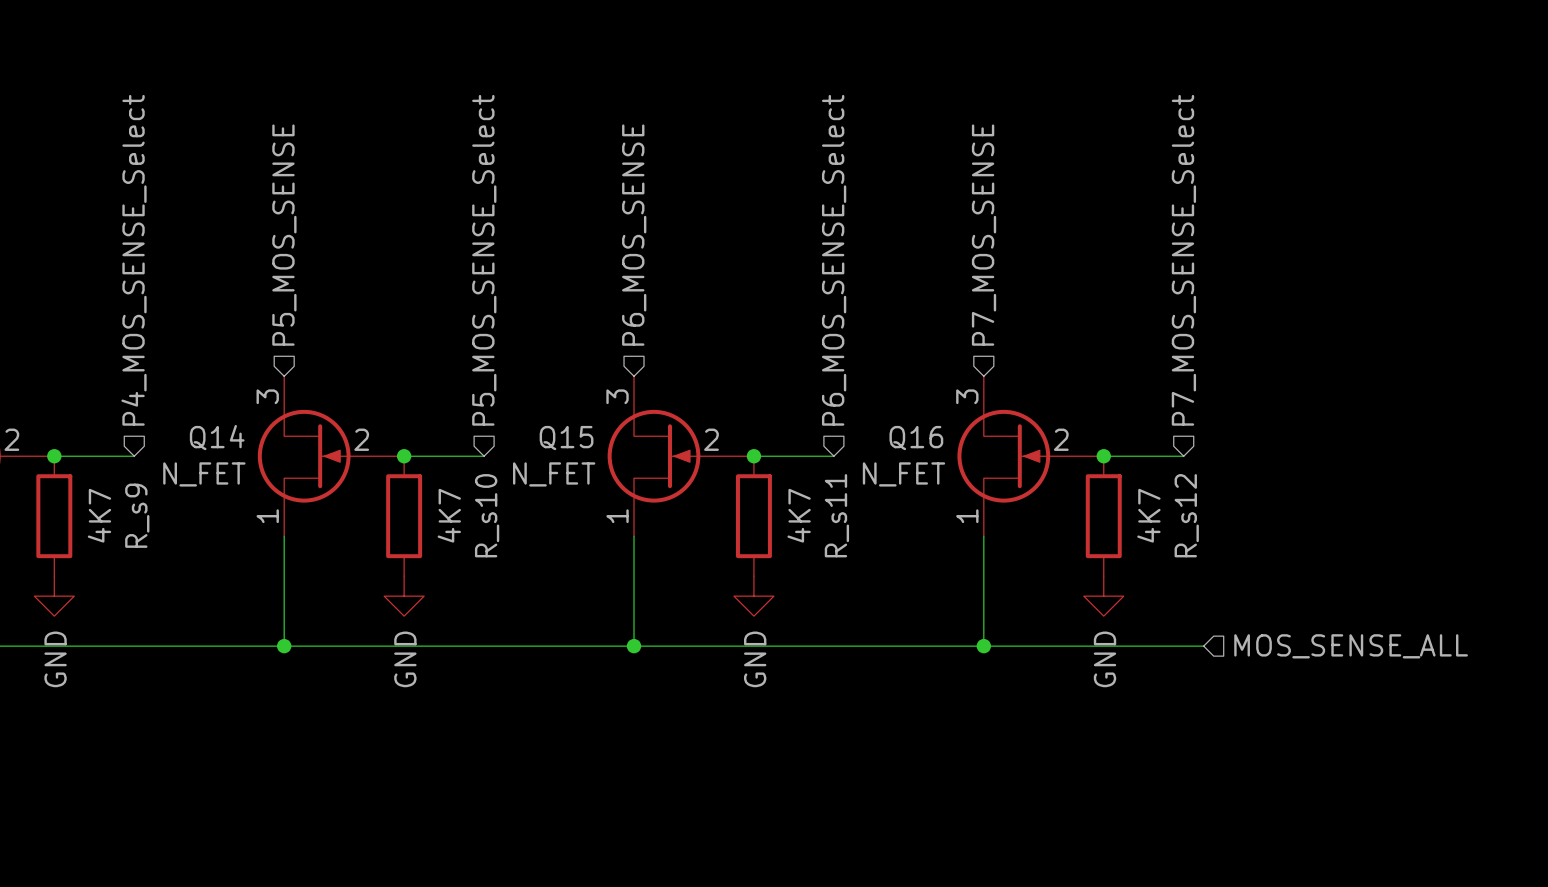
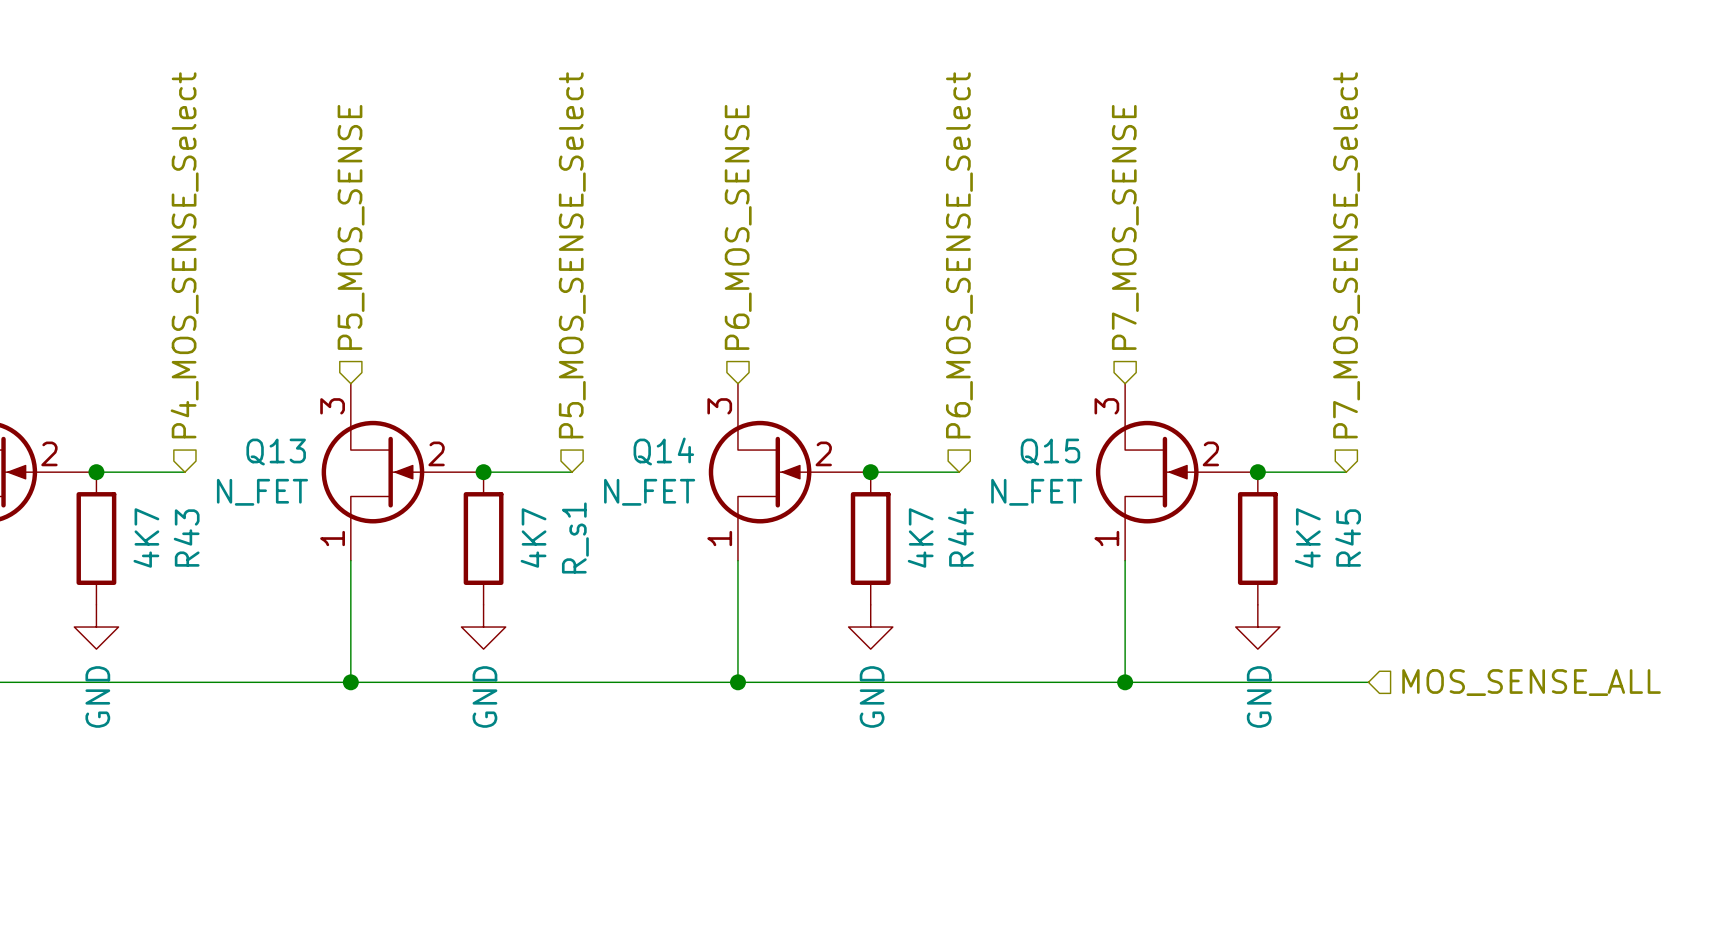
Q14 name: Q14 (217, 437) -> Q13 (276, 452)
Q15 name: Q15 (566, 438) -> Q14 (663, 451)
Q16 name: Q16 (916, 438) -> Q15 (1050, 452)
R_s9 name: R_s9 (137, 515) -> R43 (186, 538)
R_s10 name: R_s10 (487, 515) -> R_s1 (575, 538)
R_s11 name: R_s11 (836, 515) -> R44 (960, 537)
R_s12 name: R_s12 (1186, 515) -> R45 (1348, 538)

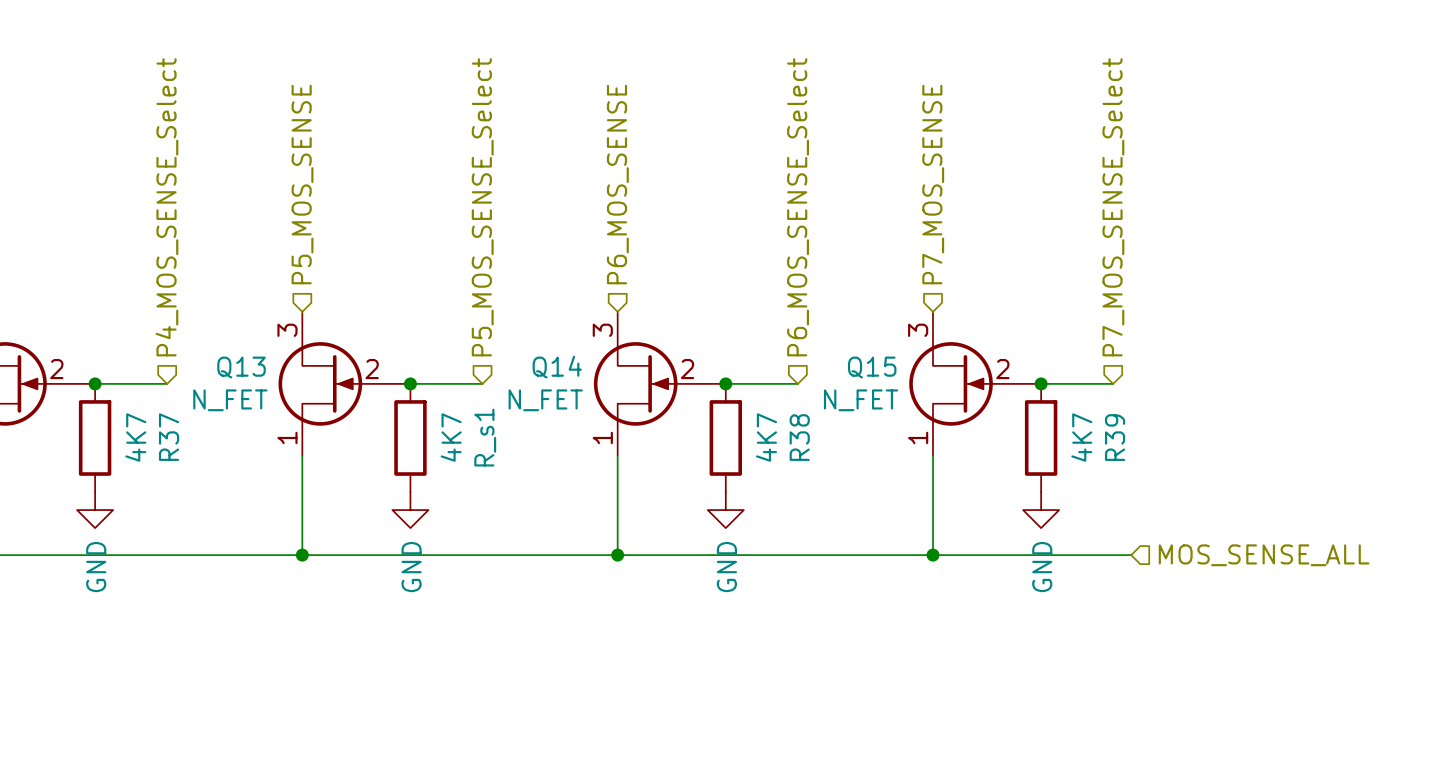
R44 name: R44 (960, 537) -> R38 (799, 437)
R43 name: R43 (186, 538) -> R37 (169, 437)
R45 name: R45 (1348, 538) -> R39 (1115, 437)

